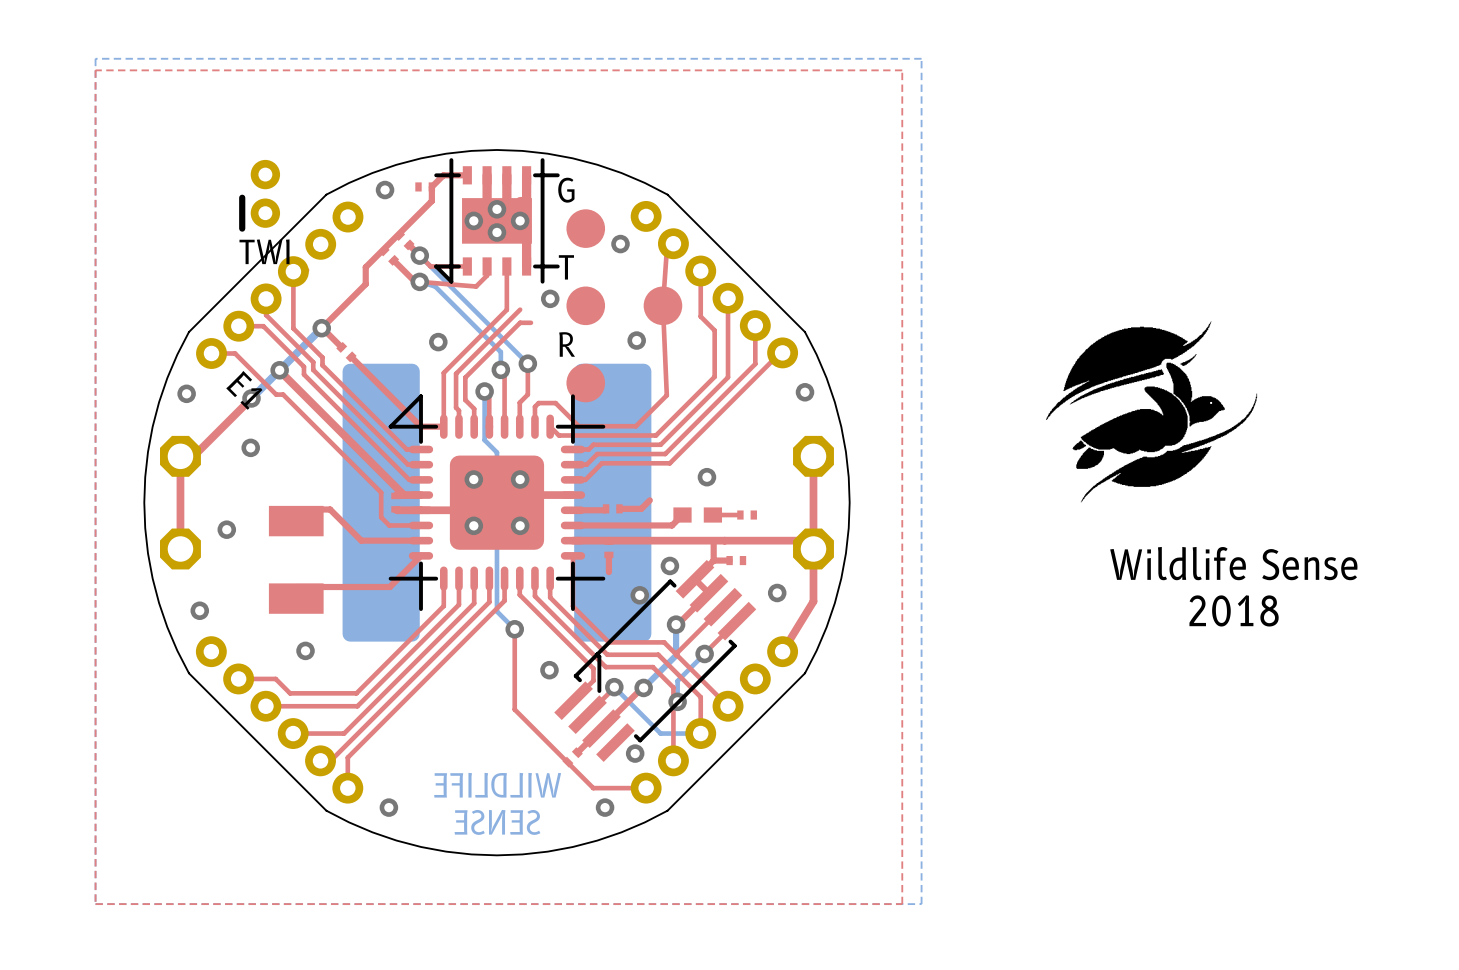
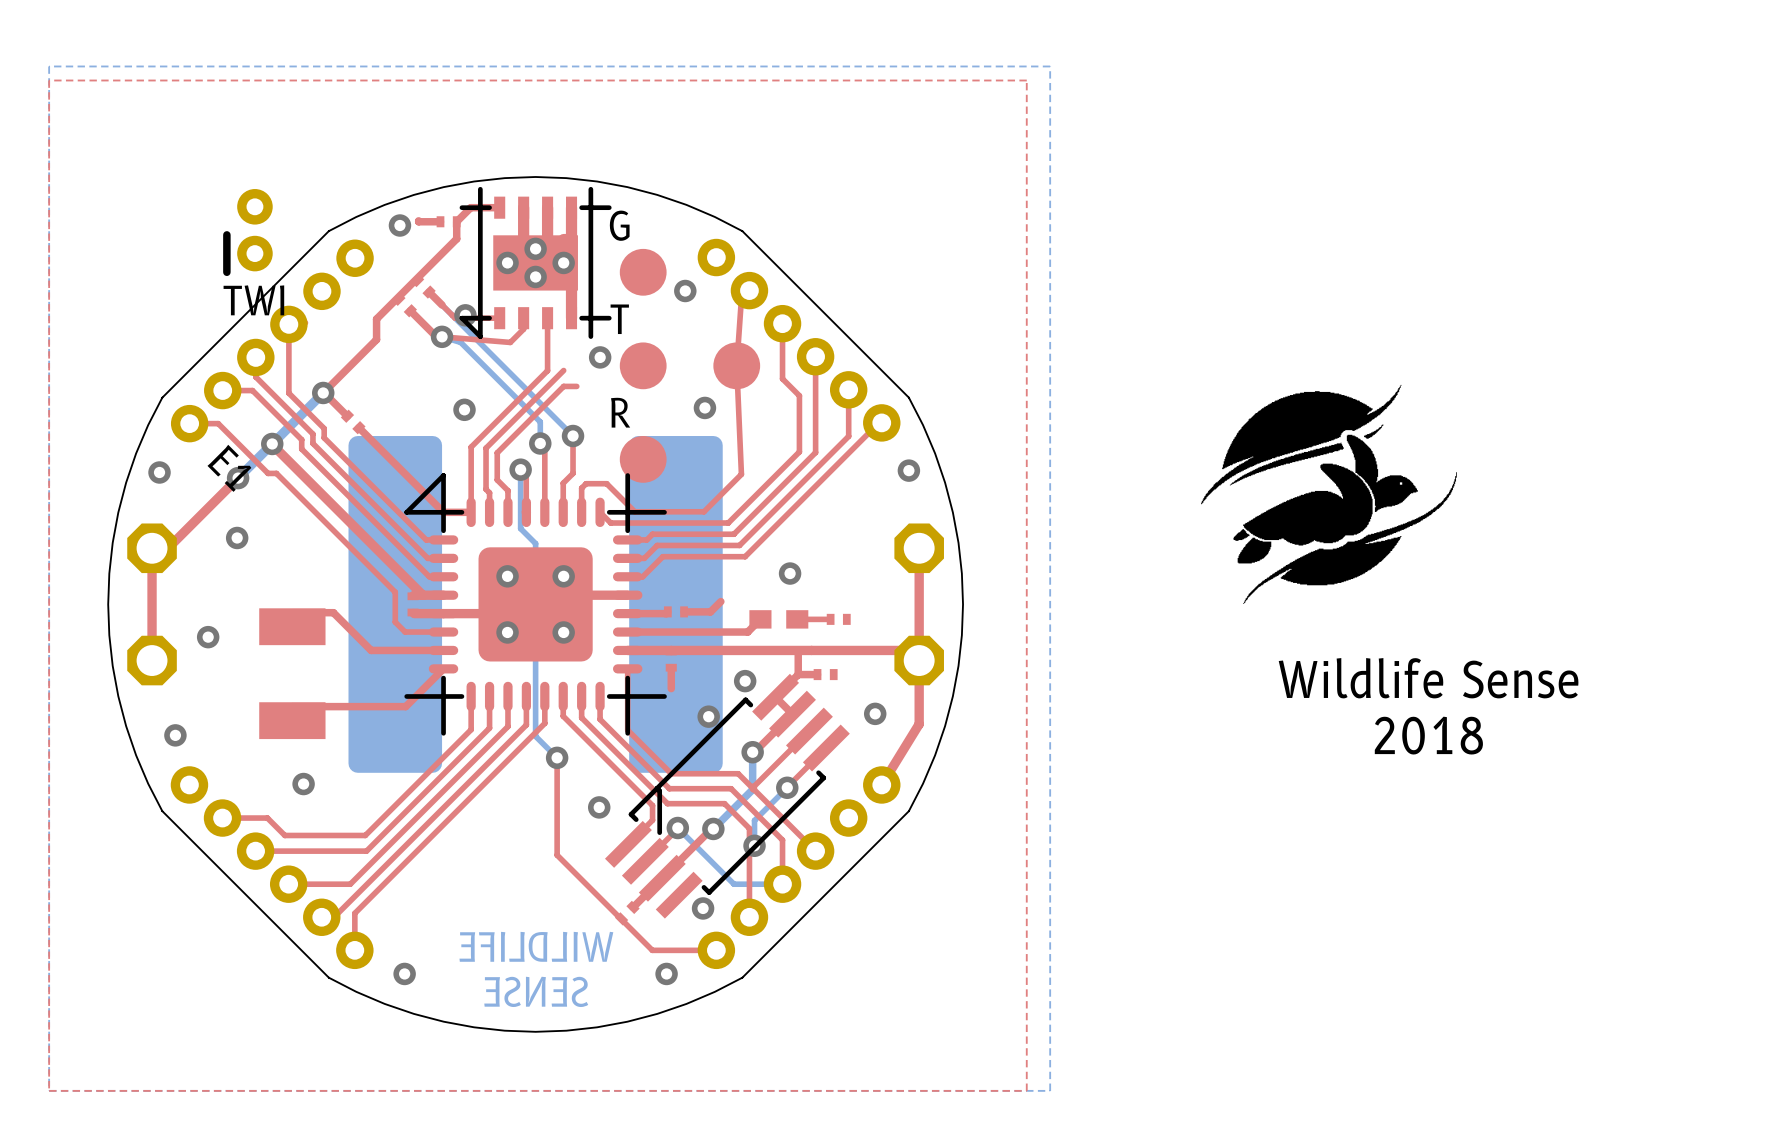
top track: none -> (418, 220) (440, 221)
via position: (419, 255) -> (465, 315)

